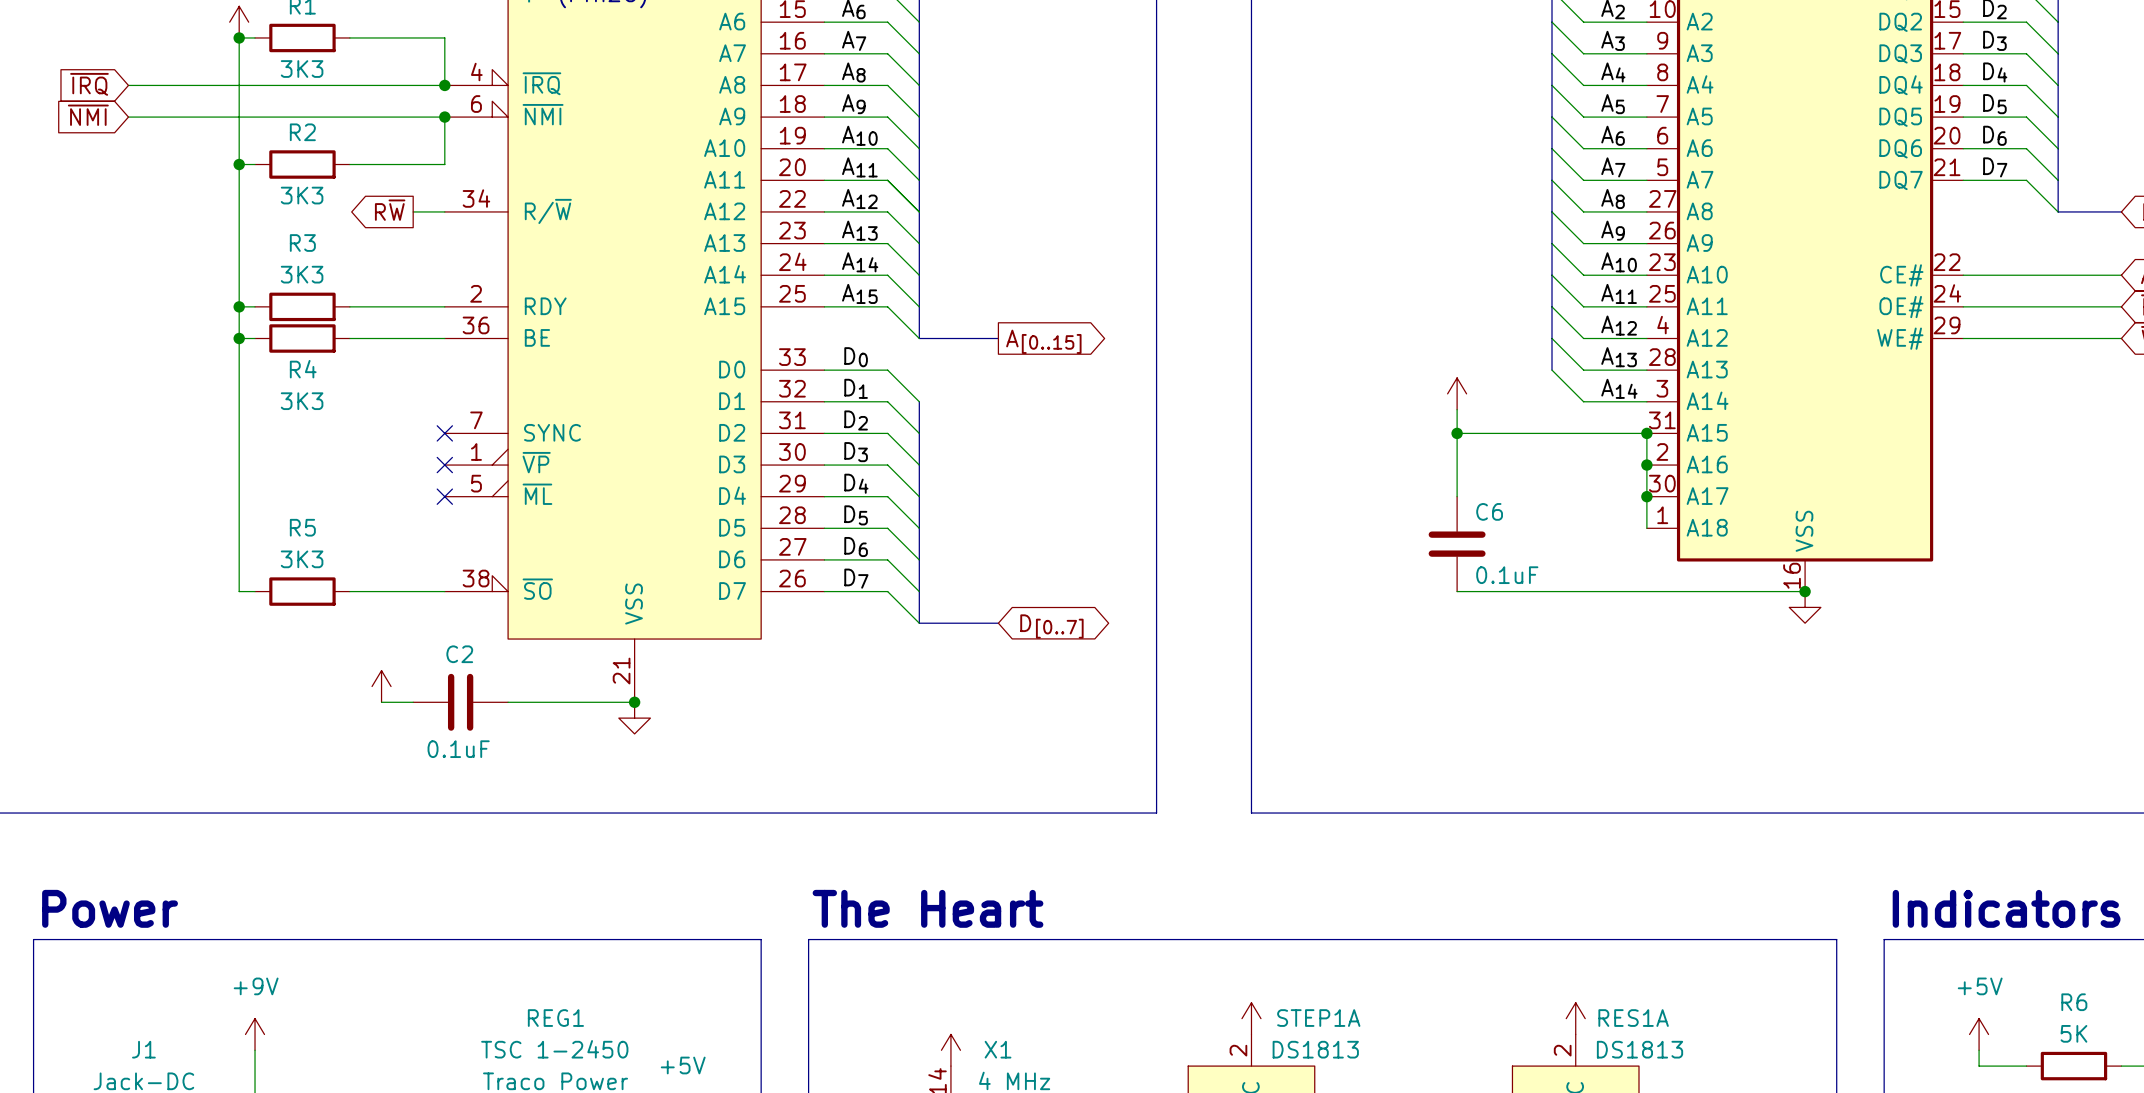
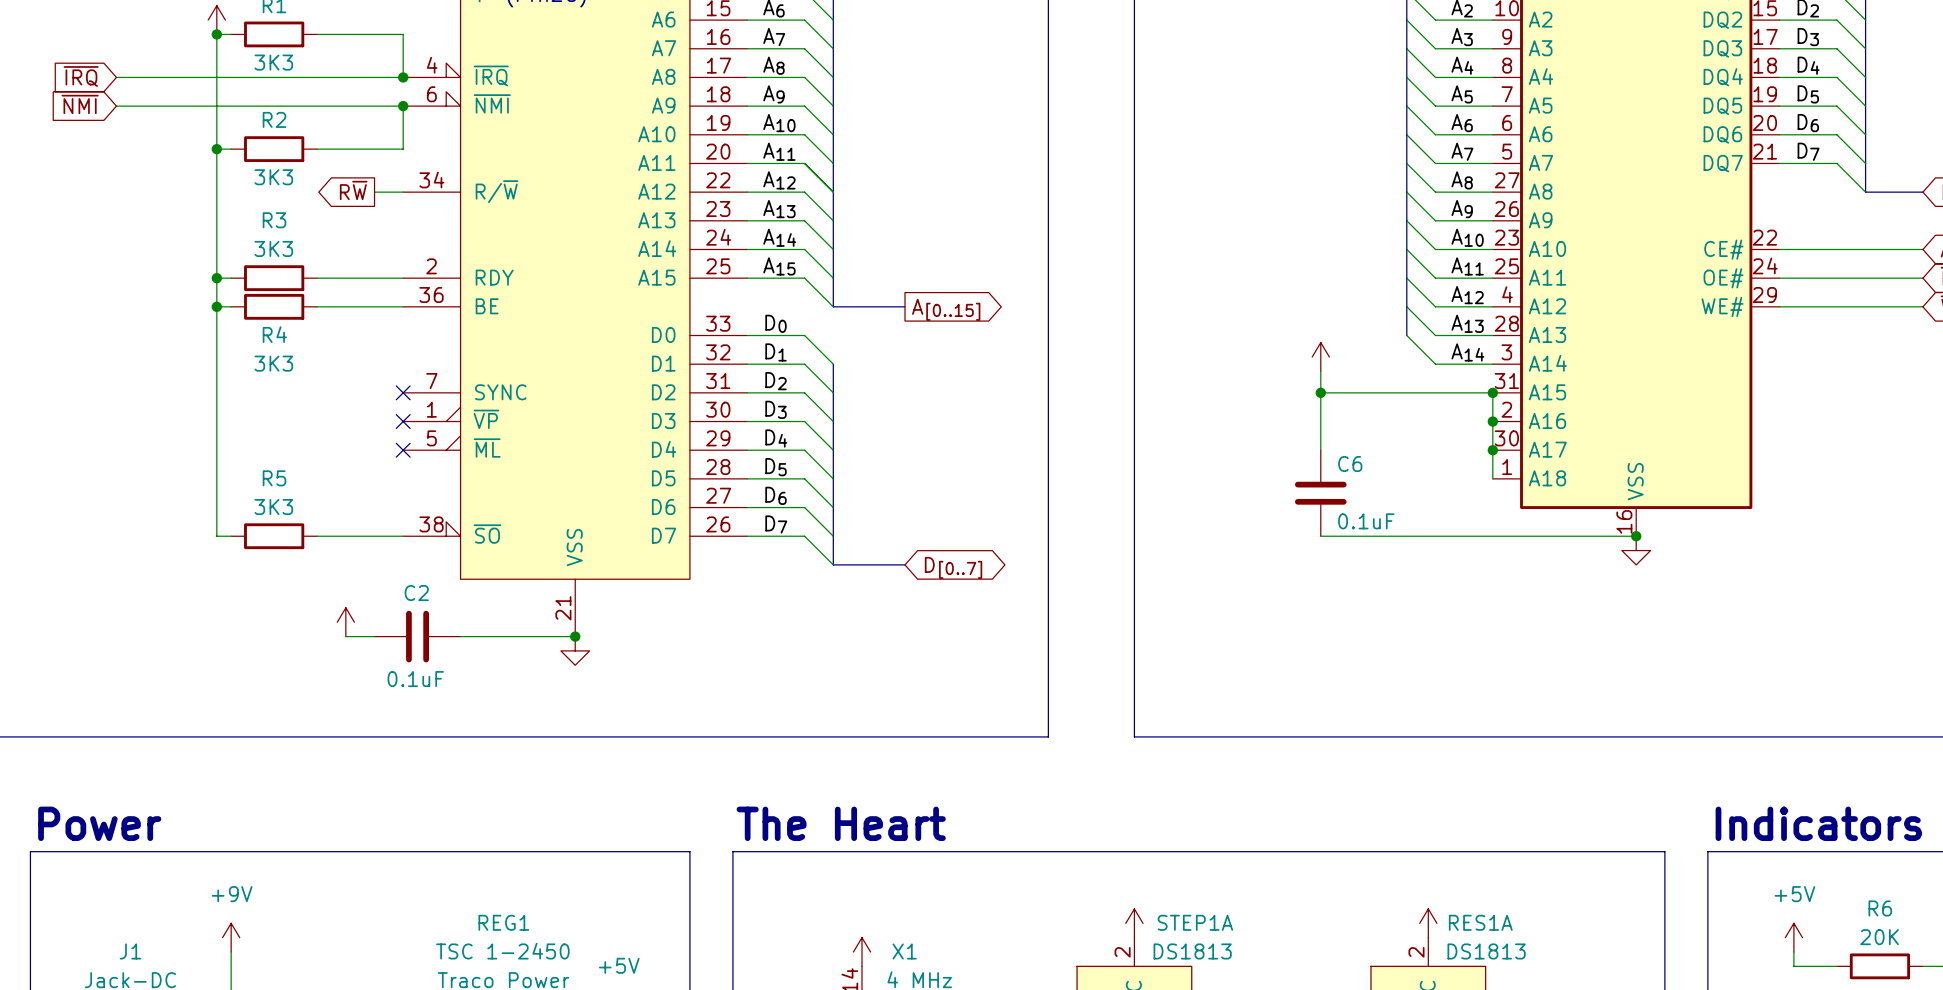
R6 value: 5K (2073, 1033) -> 20K (1879, 937)

